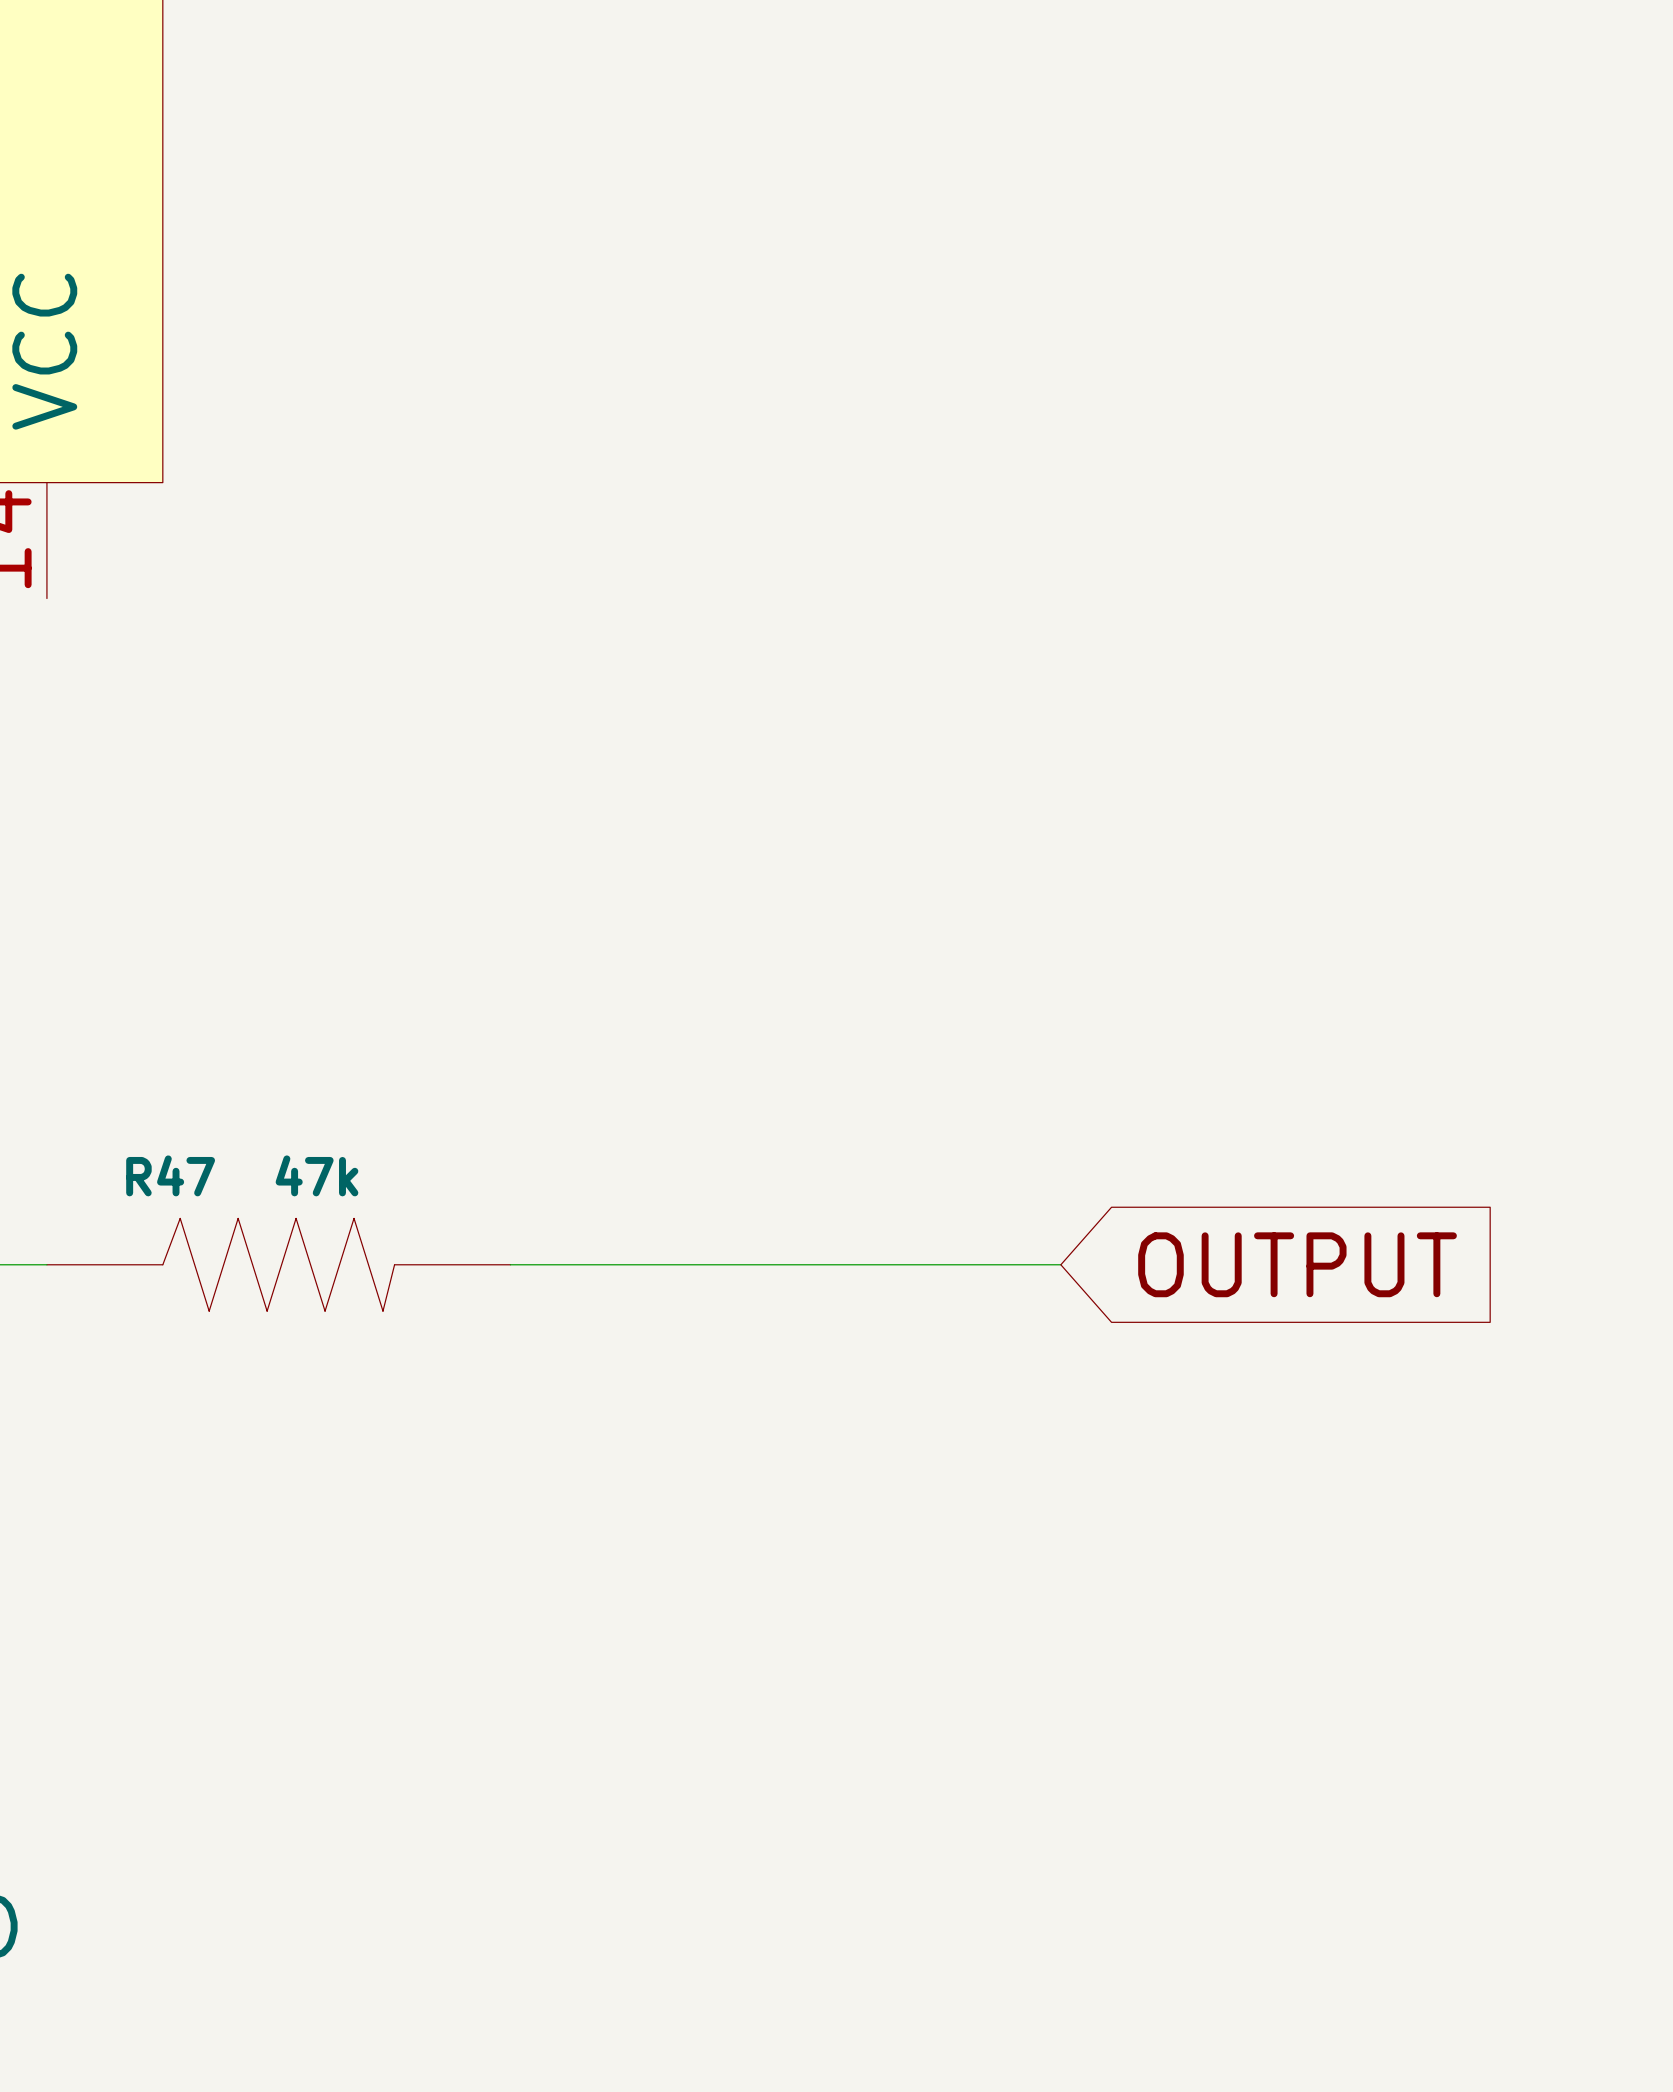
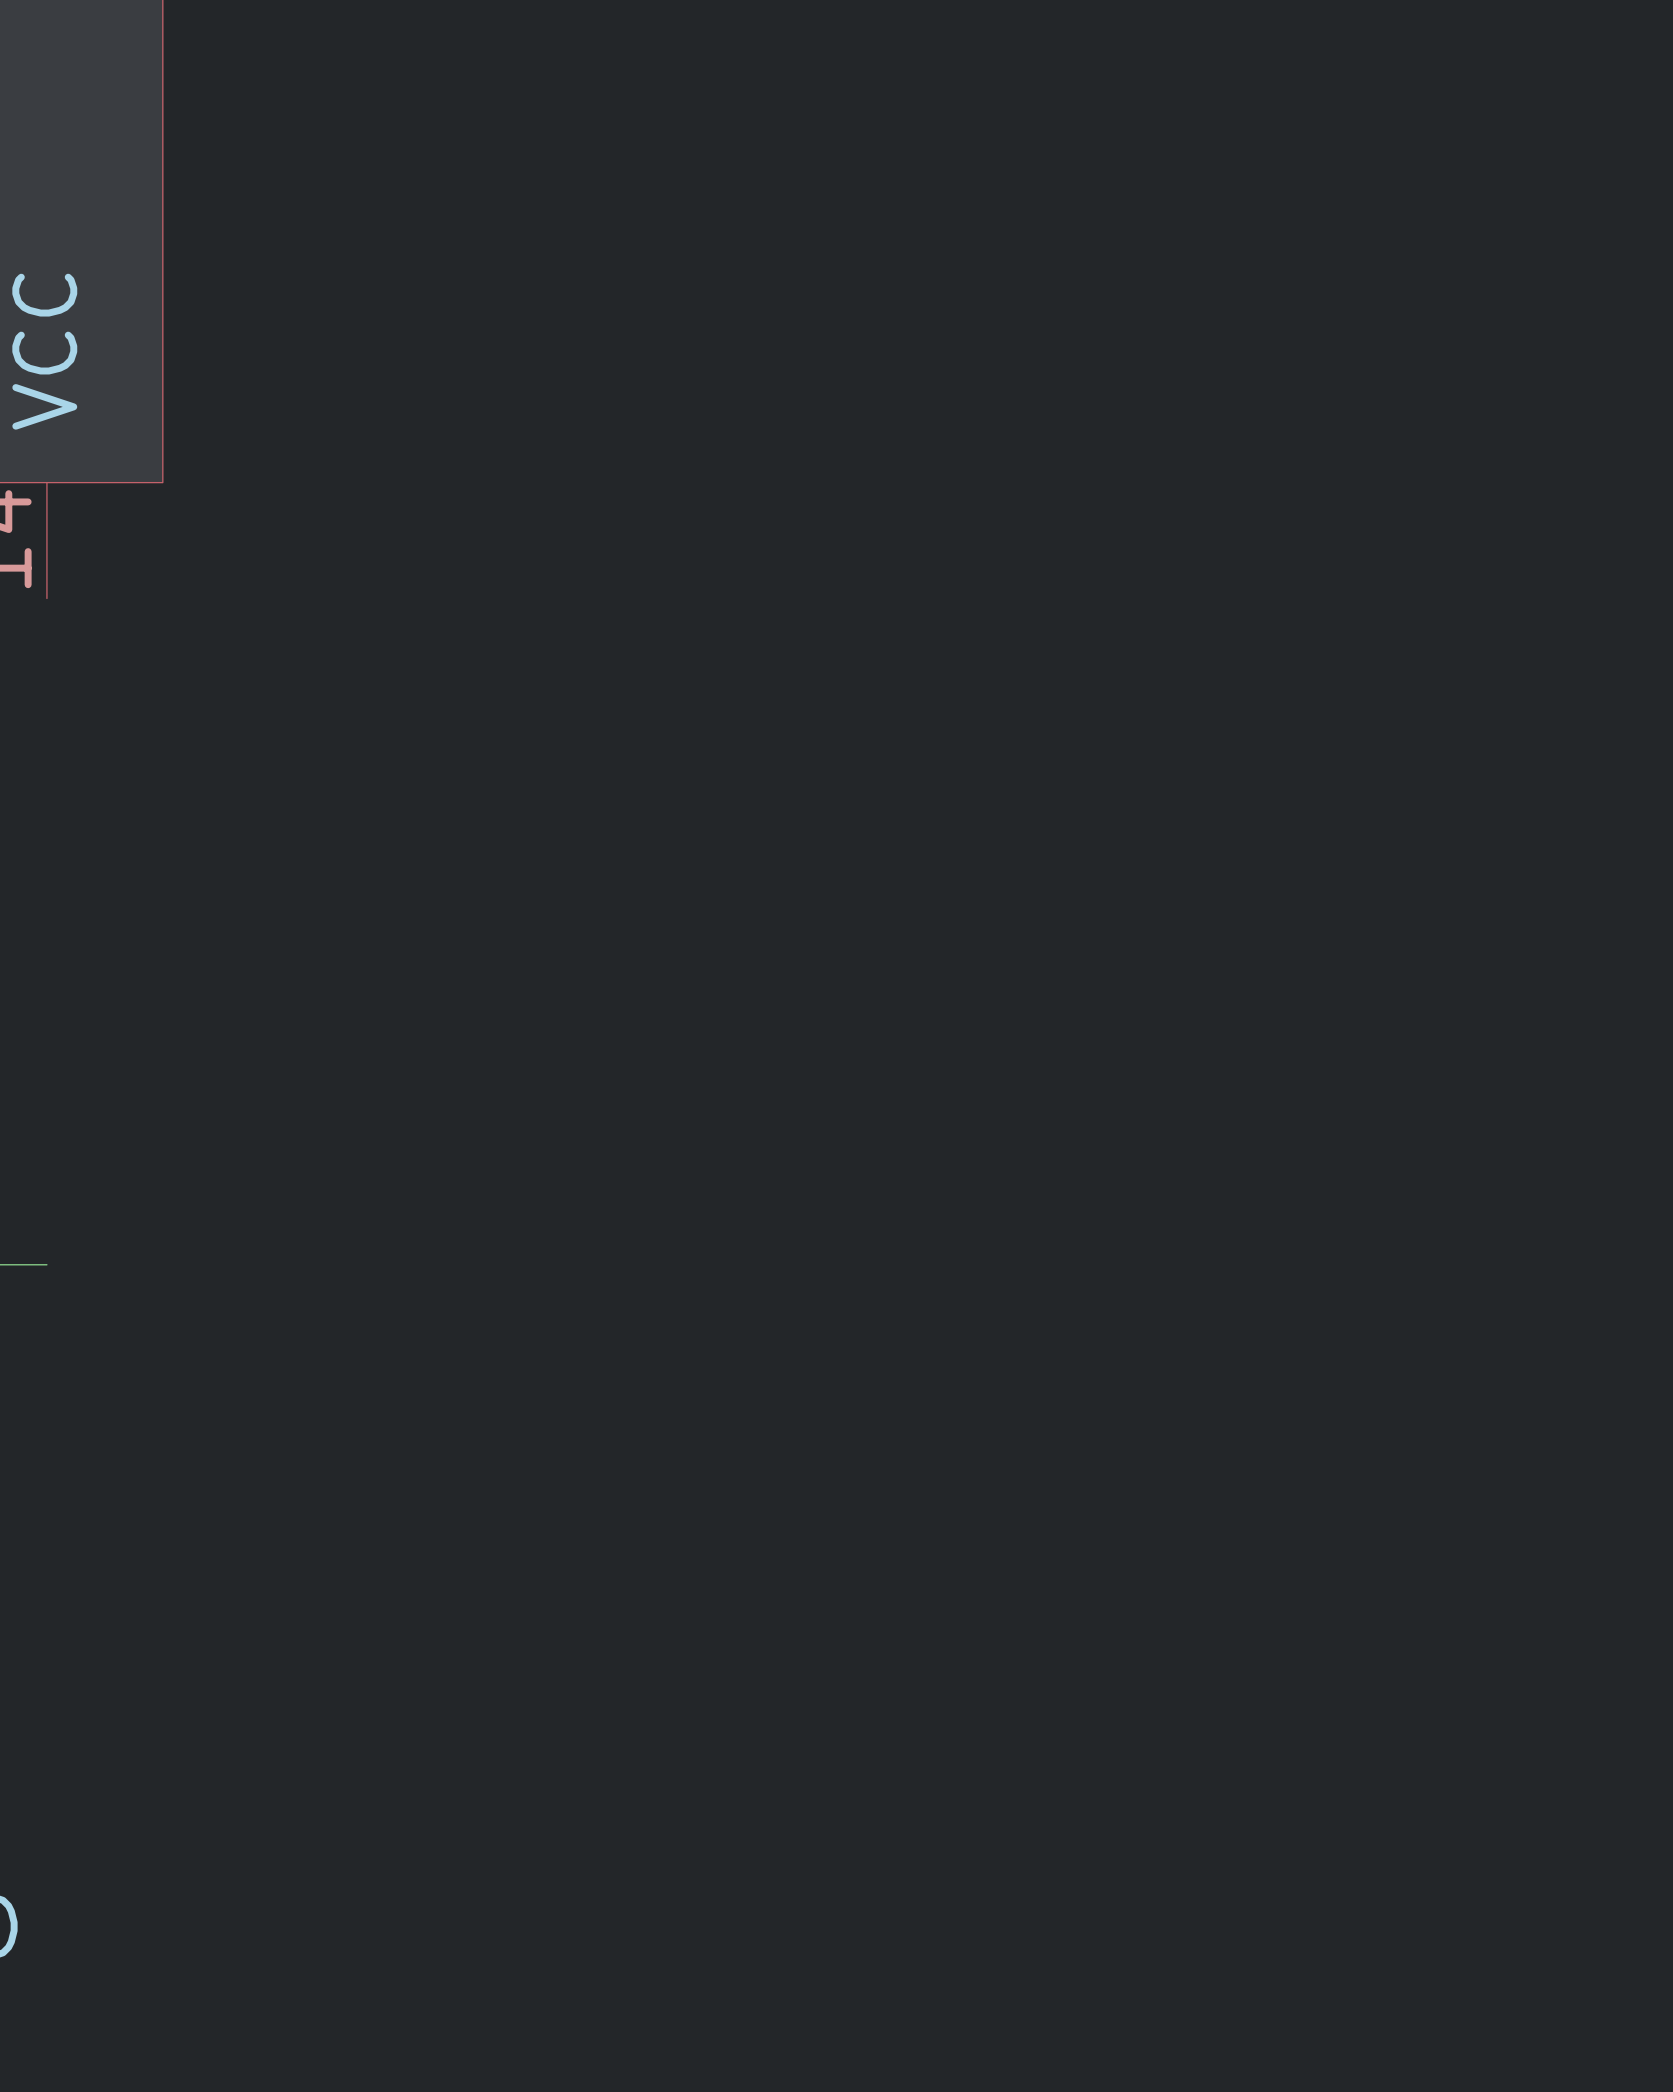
R47: 47k (278, 1264) -> none
wire: (510, 1264) (1060, 1264) -> none
global label: OUTPUT (1297, 1264) -> none

